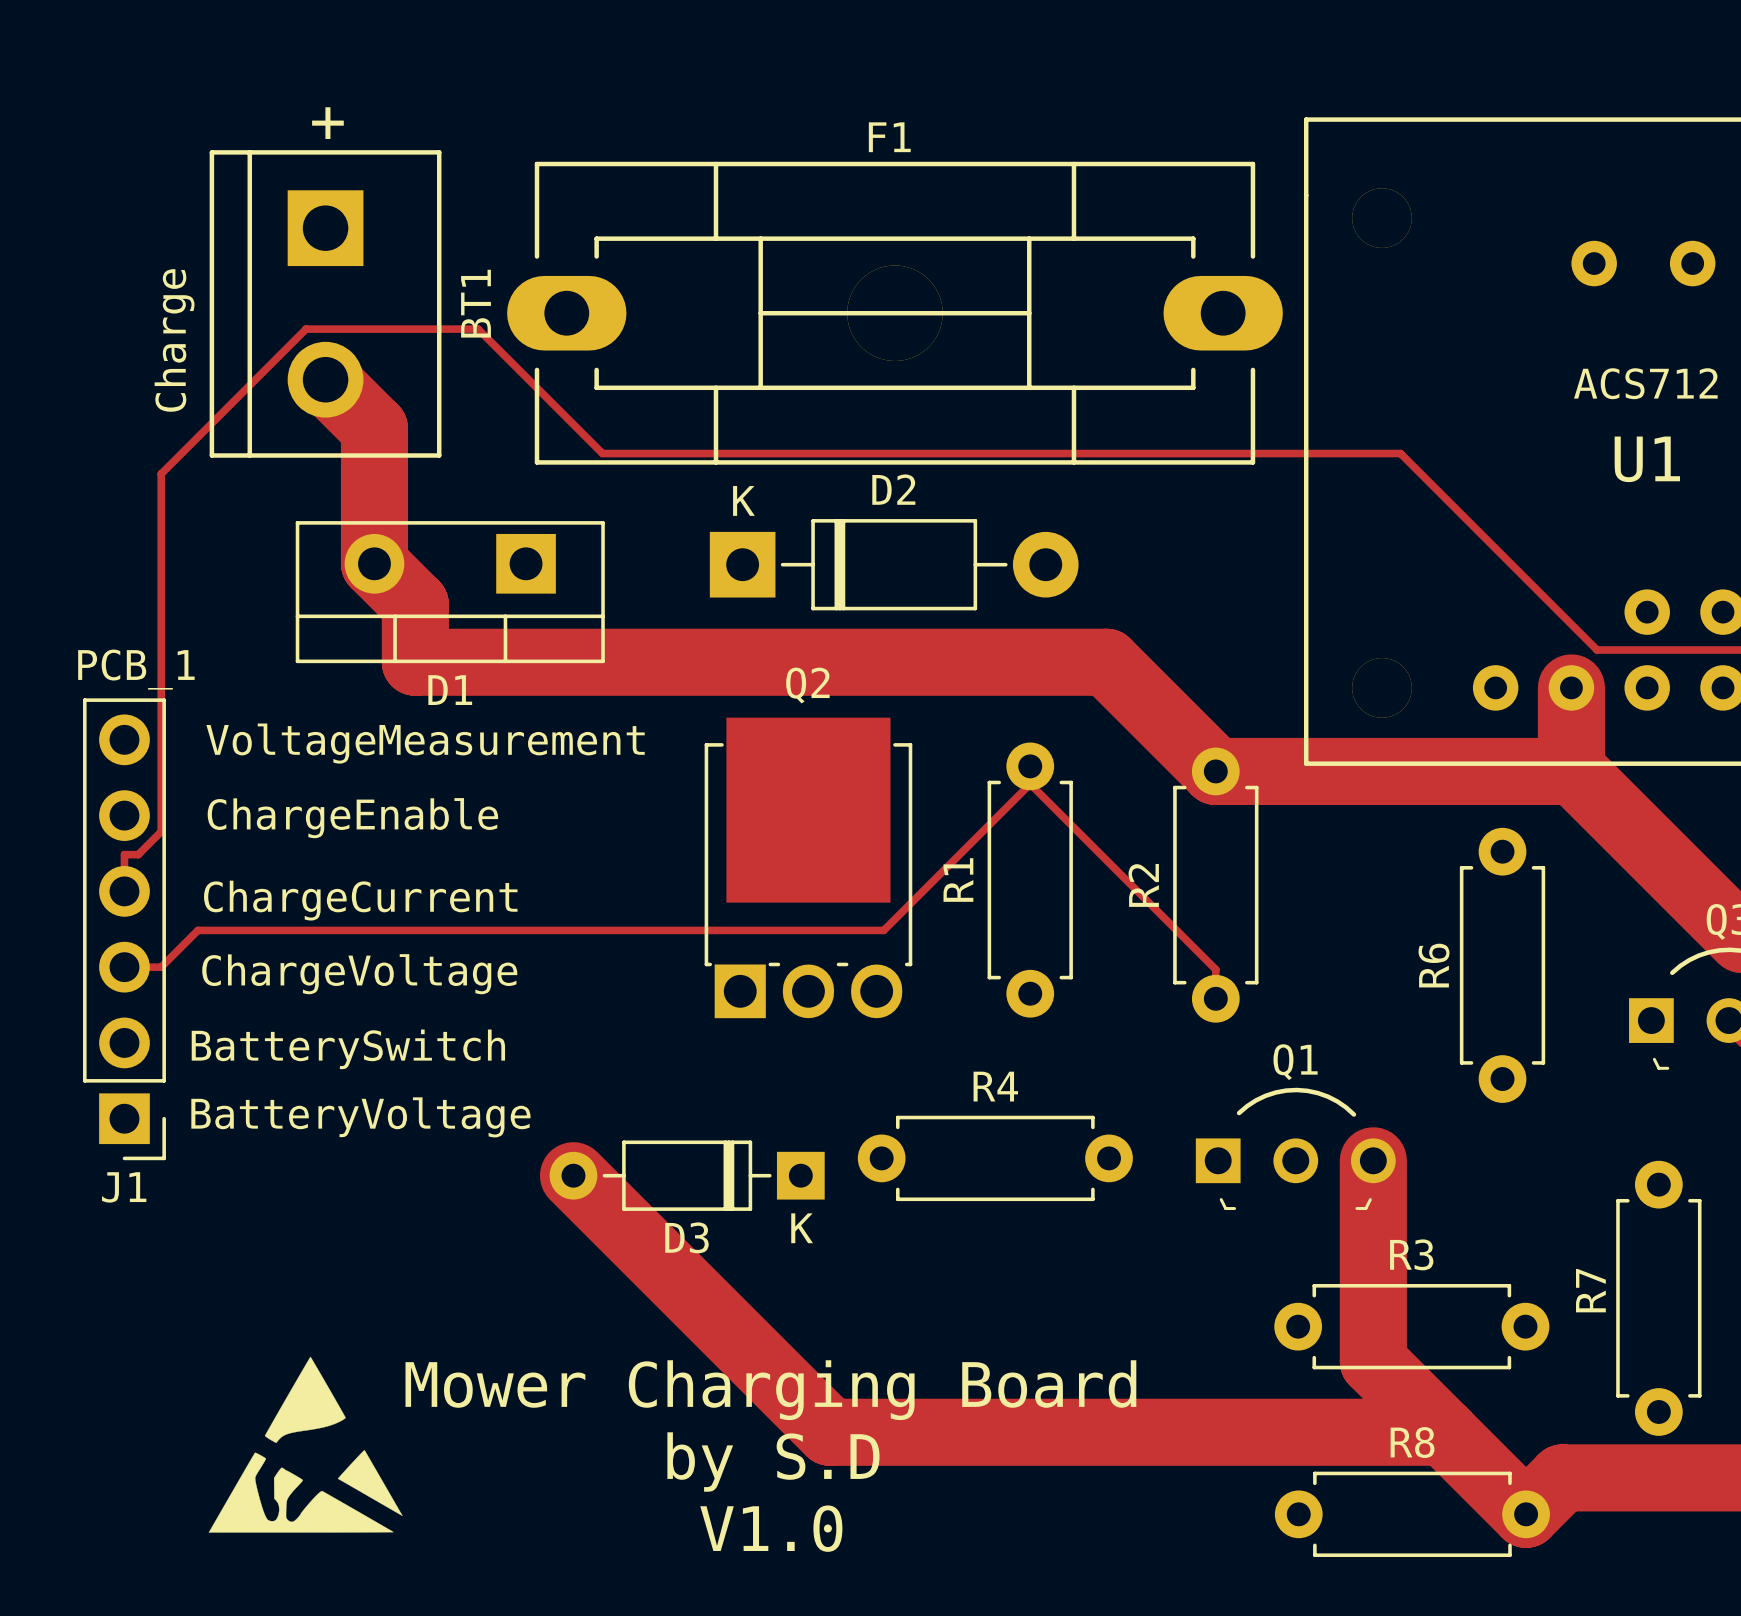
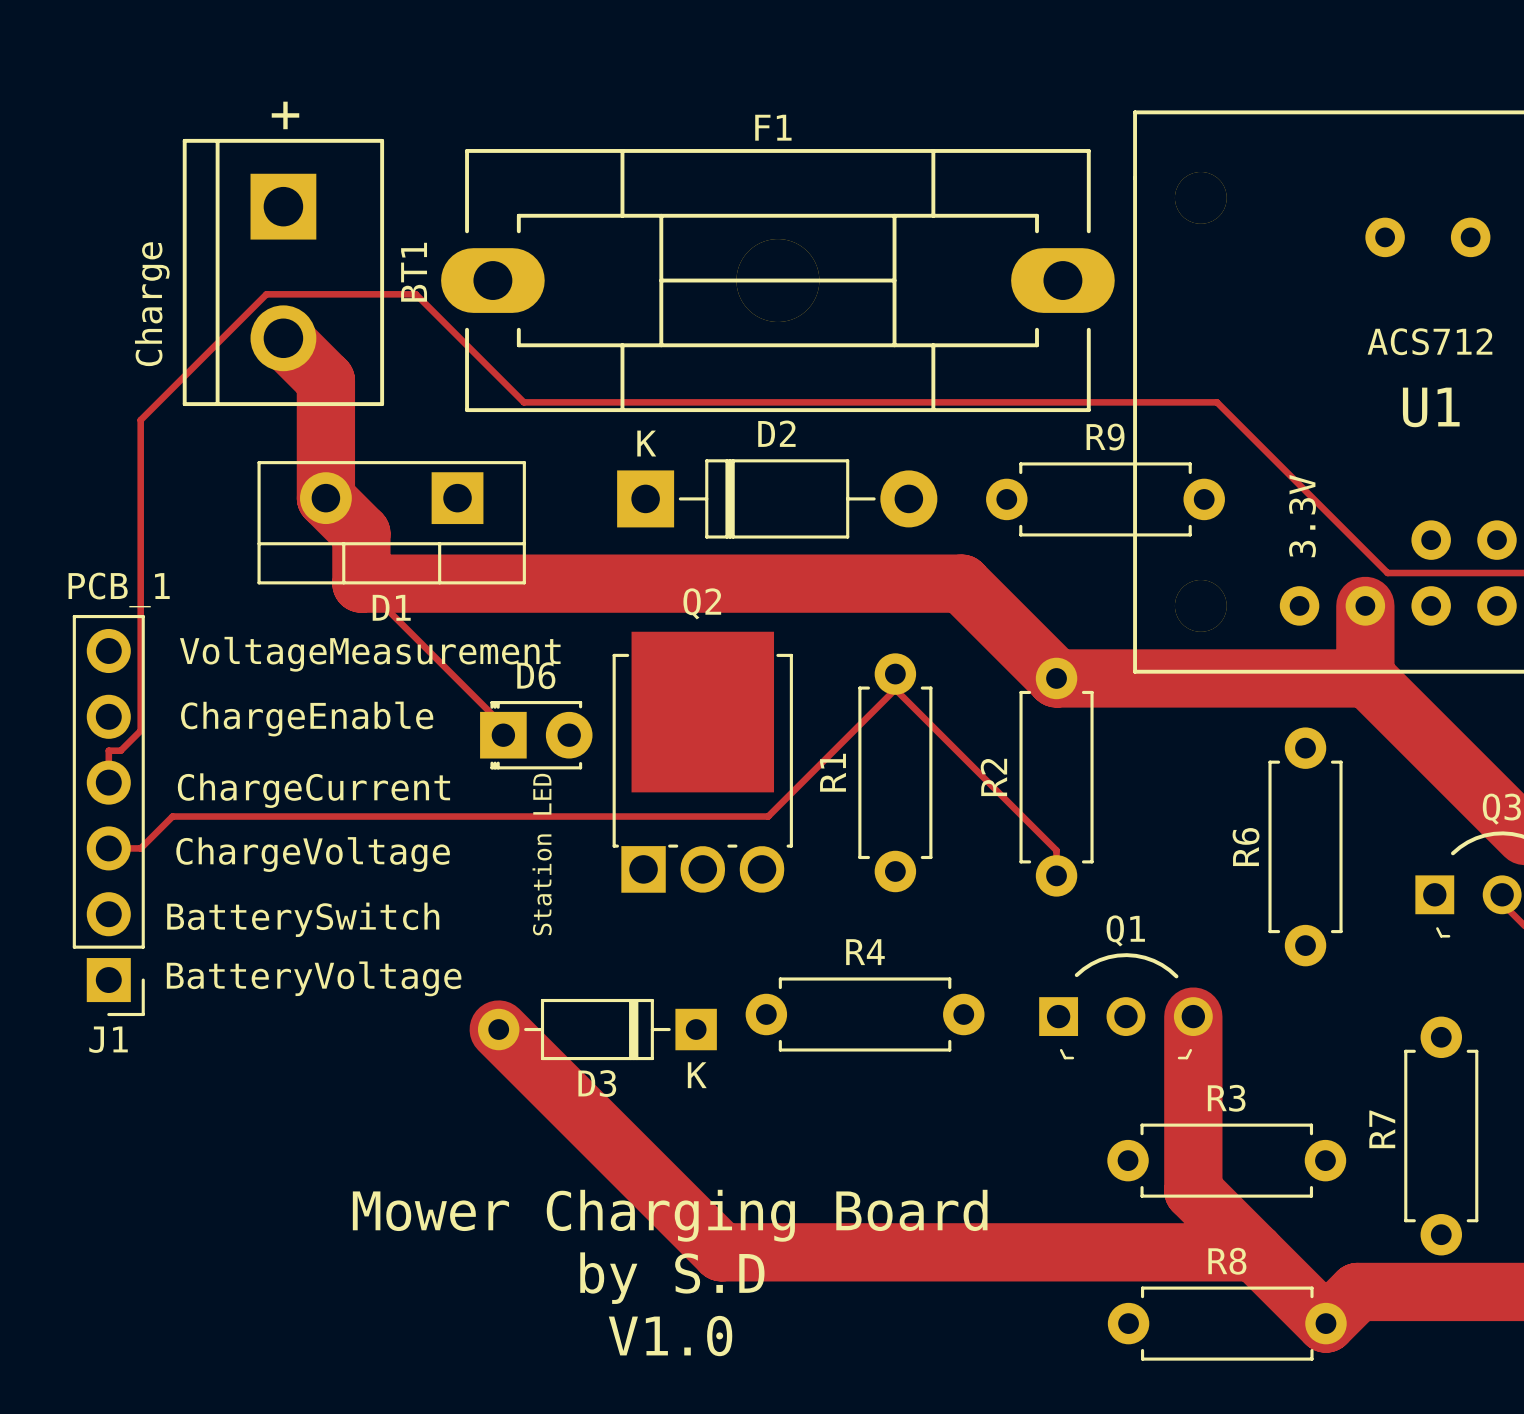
R9: none -> (1105, 499)
text: none -> 3.3V (1302, 516)
track: none -> (361, 583) (503, 725) (503, 735)
D6: none -> Station LED (536, 735)
drawing: [208, 1356, 403, 1533] -> none

